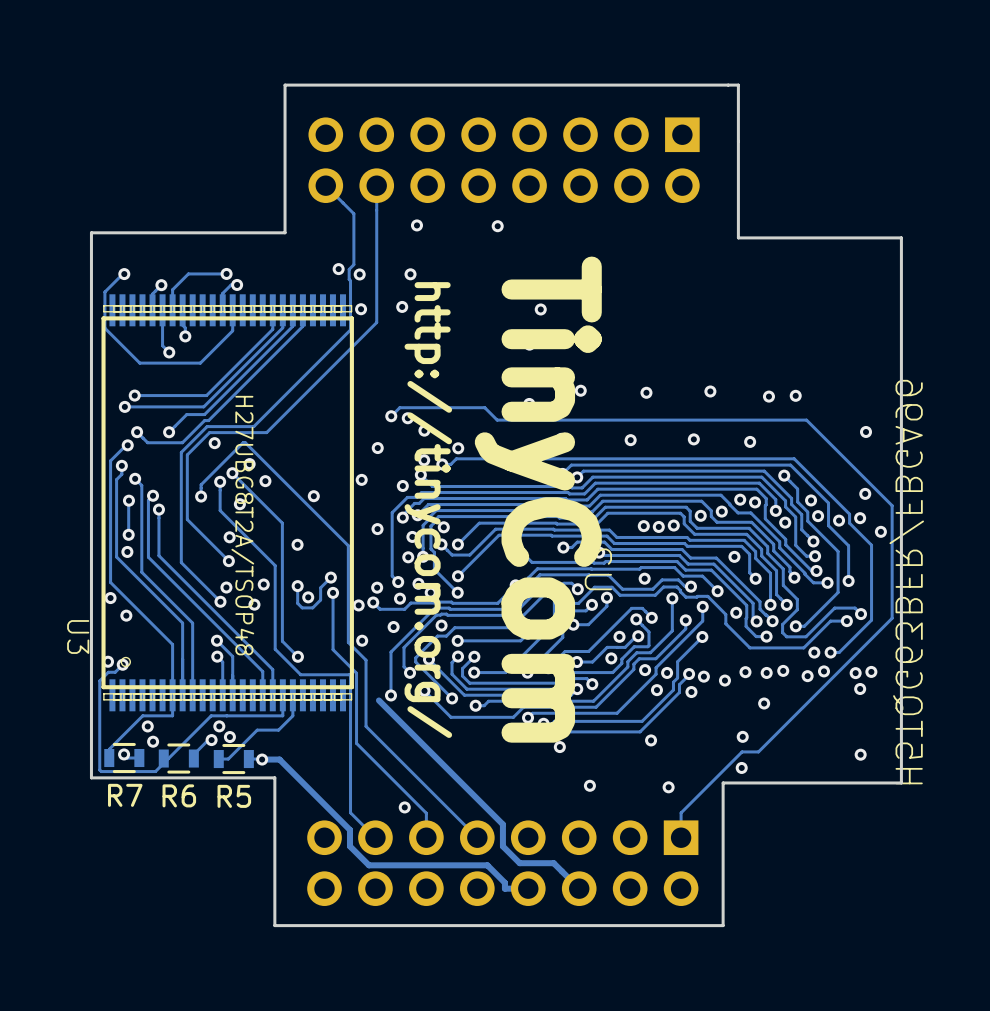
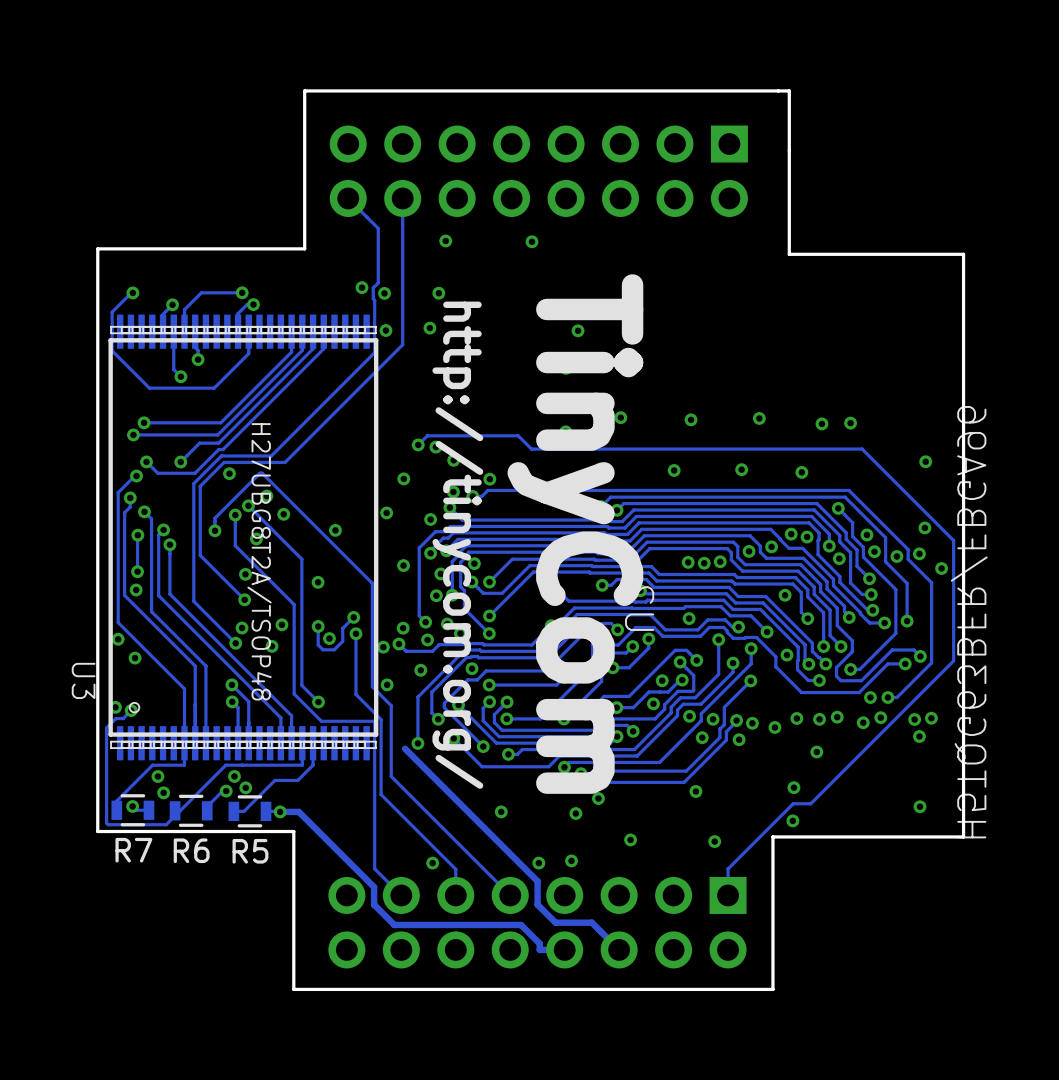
via: none -> (501, 811)
via: none -> (575, 813)
via: none -> (571, 860)
via: none -> (538, 863)

